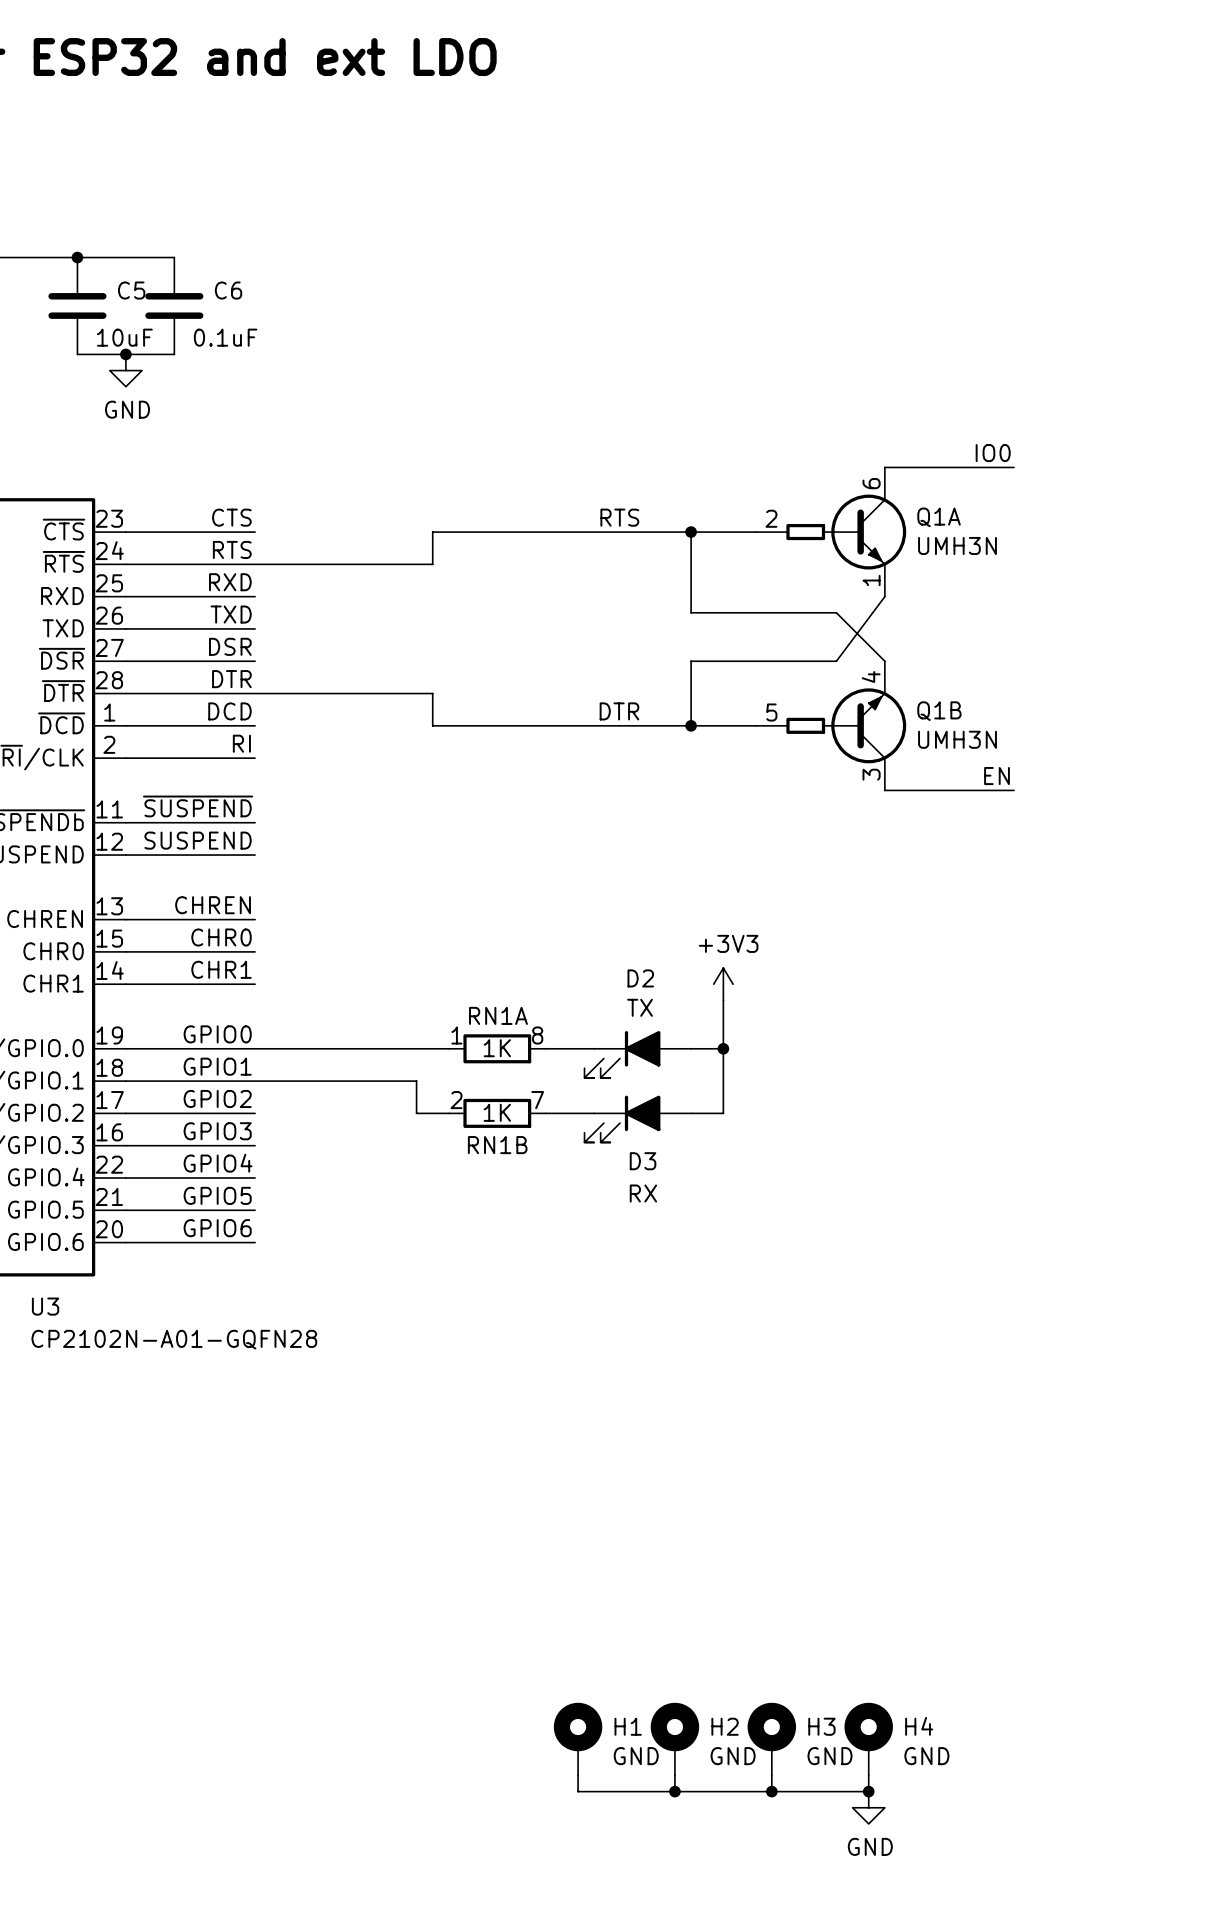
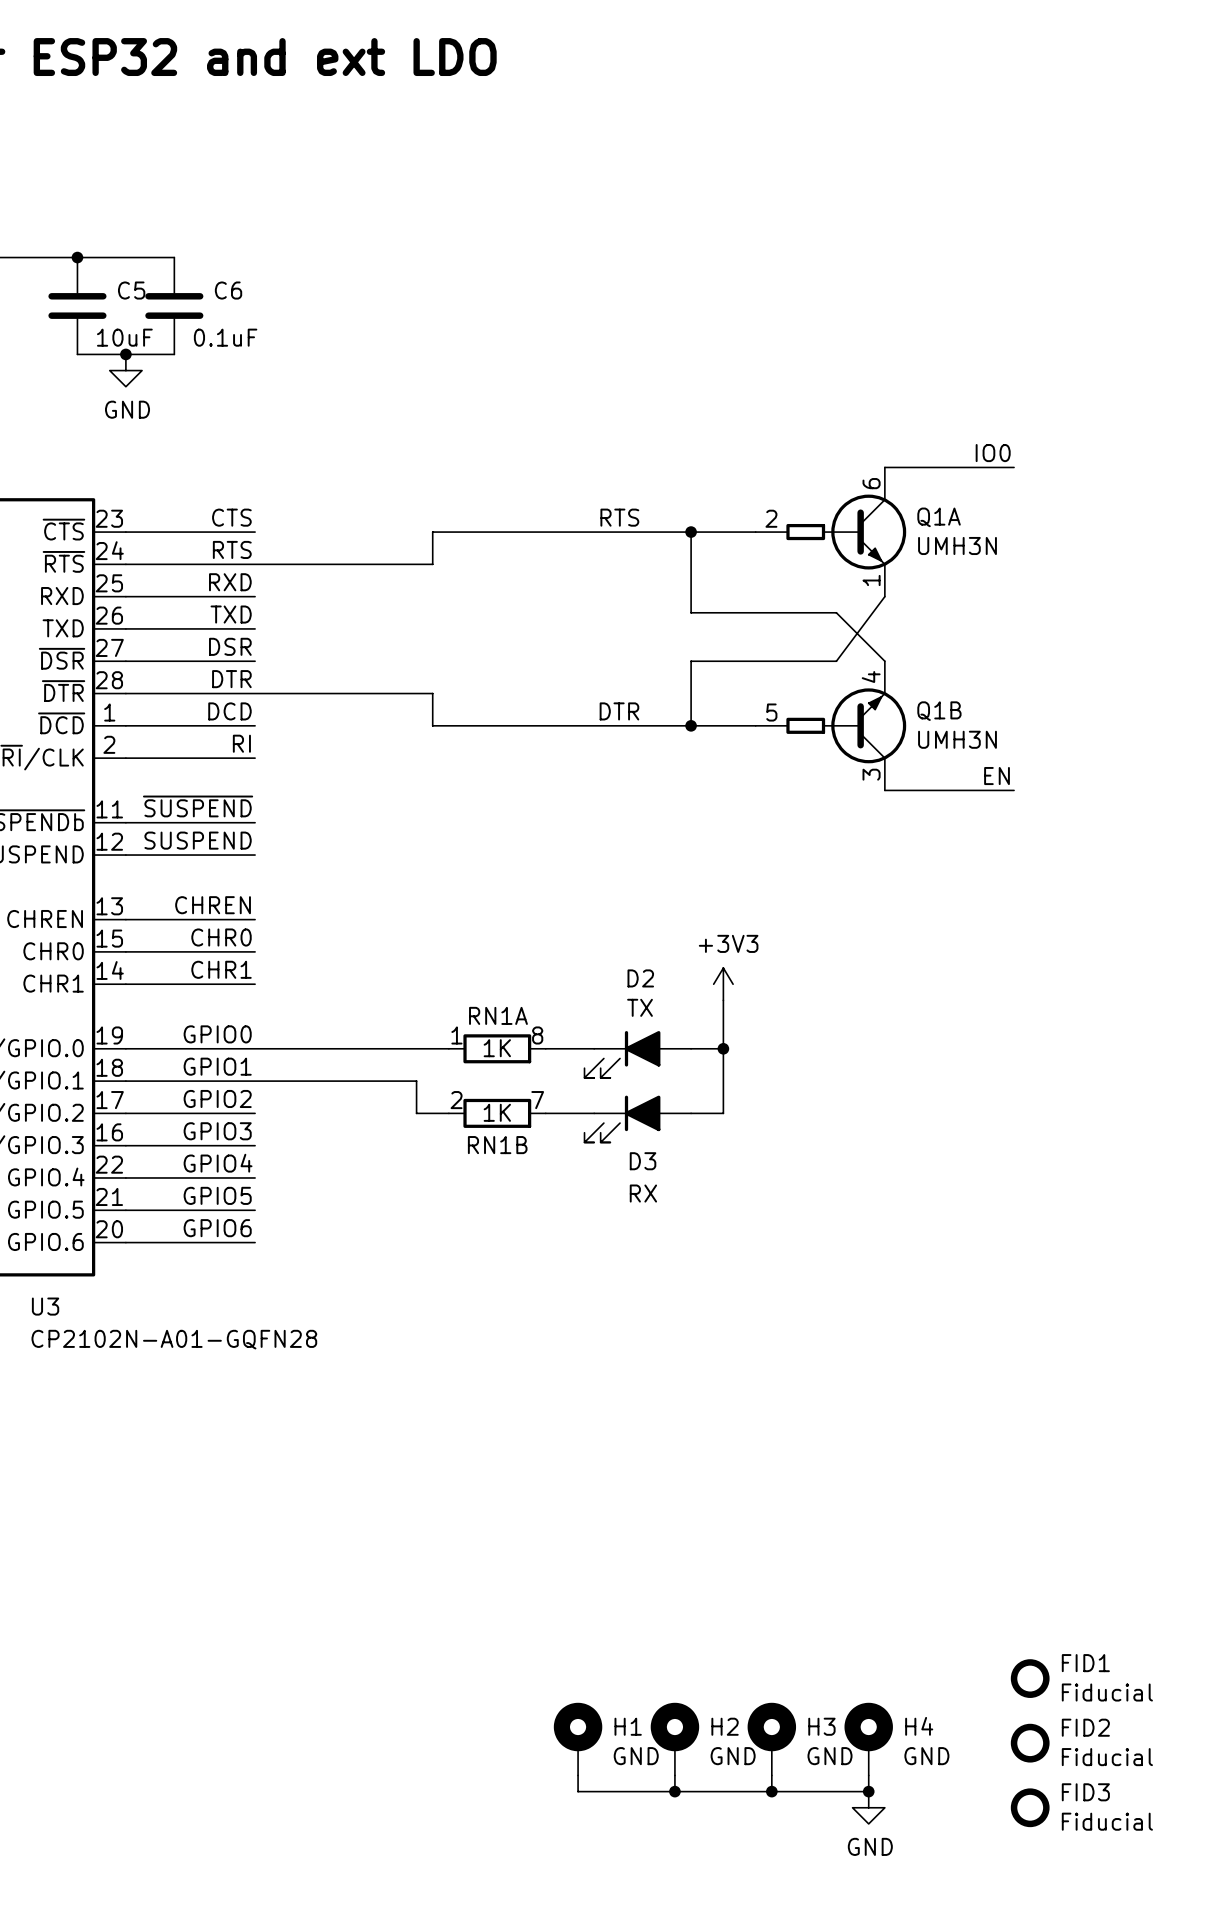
FID1: none -> Fiducial (1030, 1678)
FID2: none -> Fiducial (1030, 1743)
FID3: none -> Fiducial (1030, 1807)

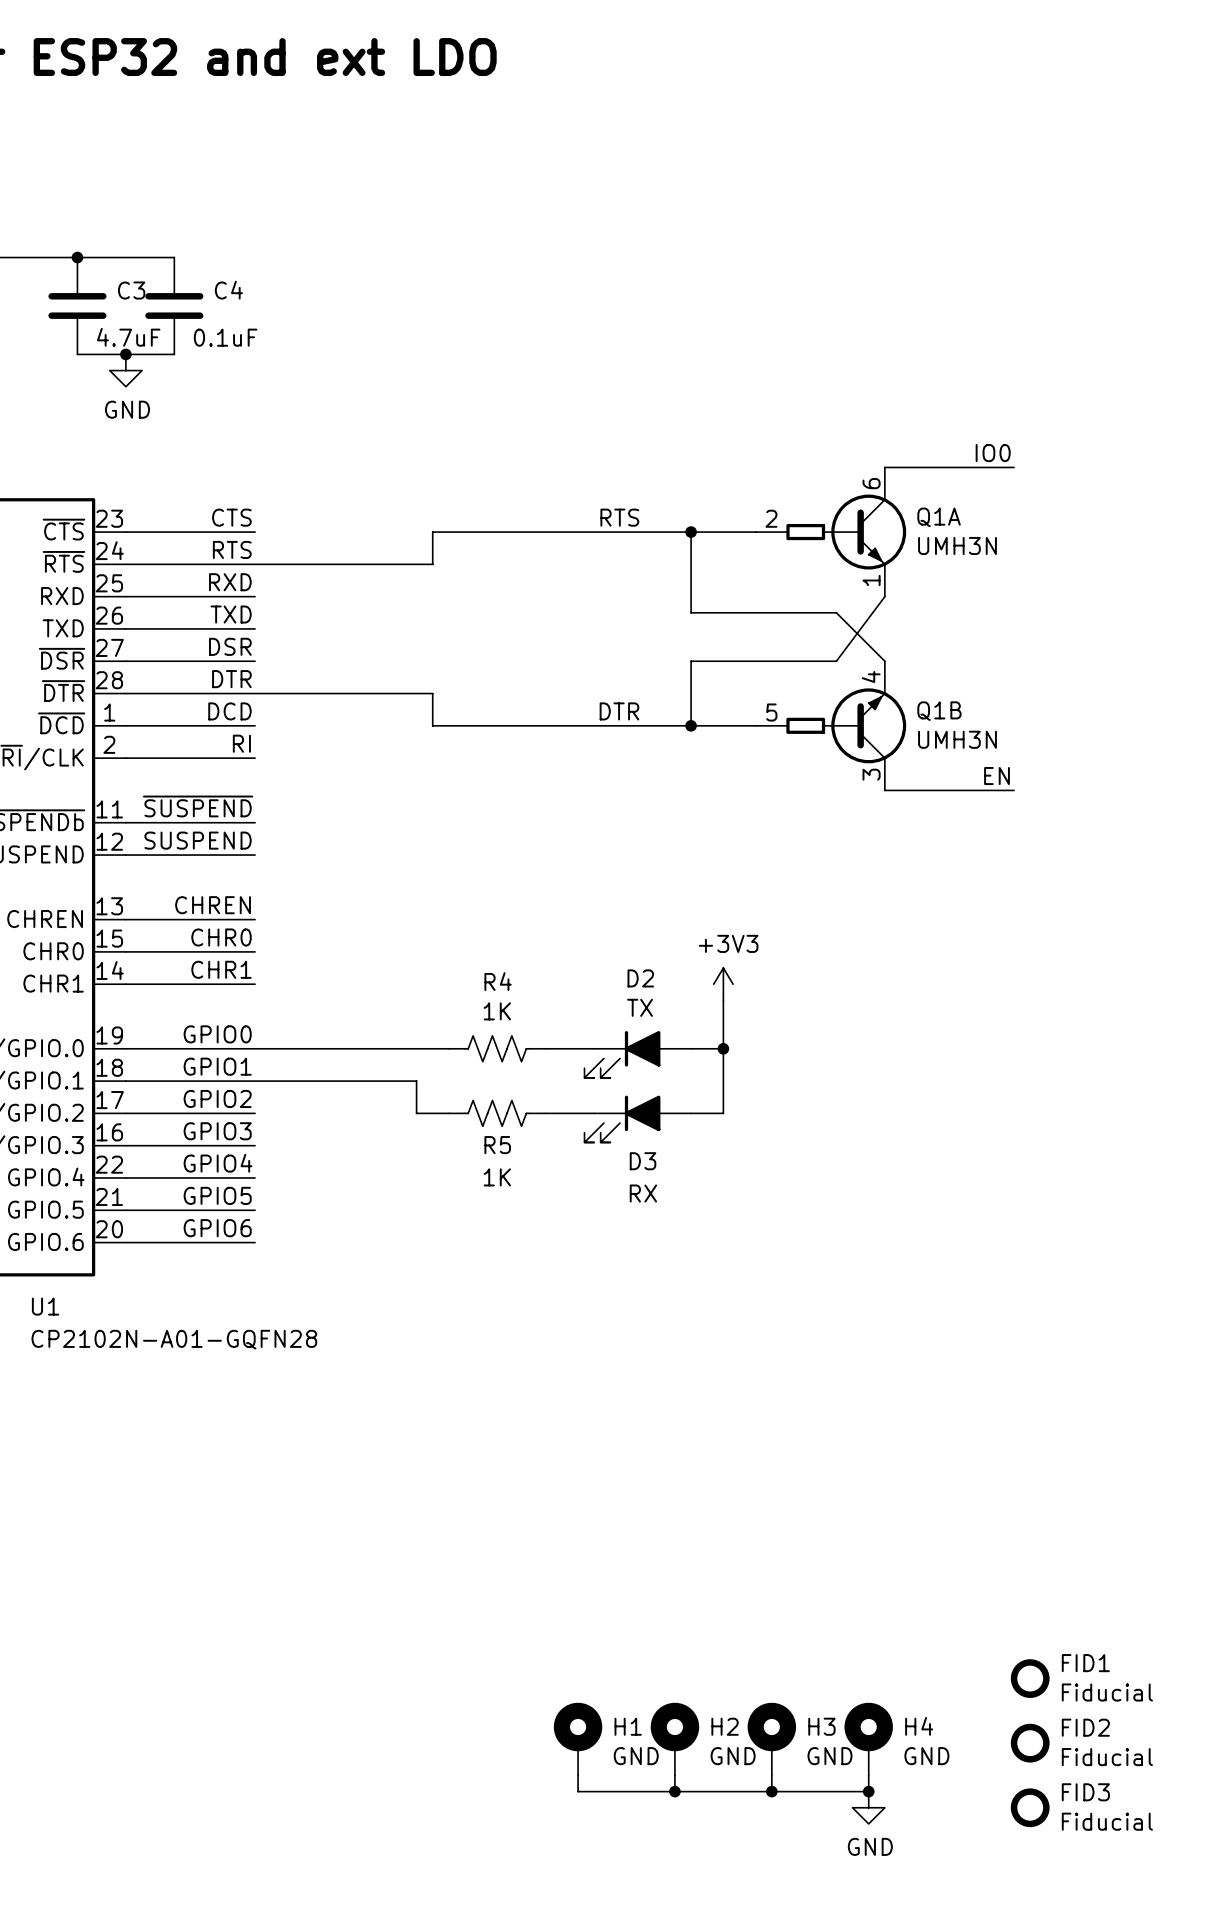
C5 name: C5 (131, 290) -> C3 (131, 290)
C6 name: C6 (228, 290) -> C4 (228, 290)
C5 value: 10uF (124, 337) -> 4.7uF (128, 337)
RN1A: 1K (497, 1048) -> none
R4: none -> 1K (497, 1048)
RN1B: 1K (497, 1113) -> none
R5: none -> 1K (497, 1113)
U3 name: U3 (45, 1306) -> U1 (45, 1306)

